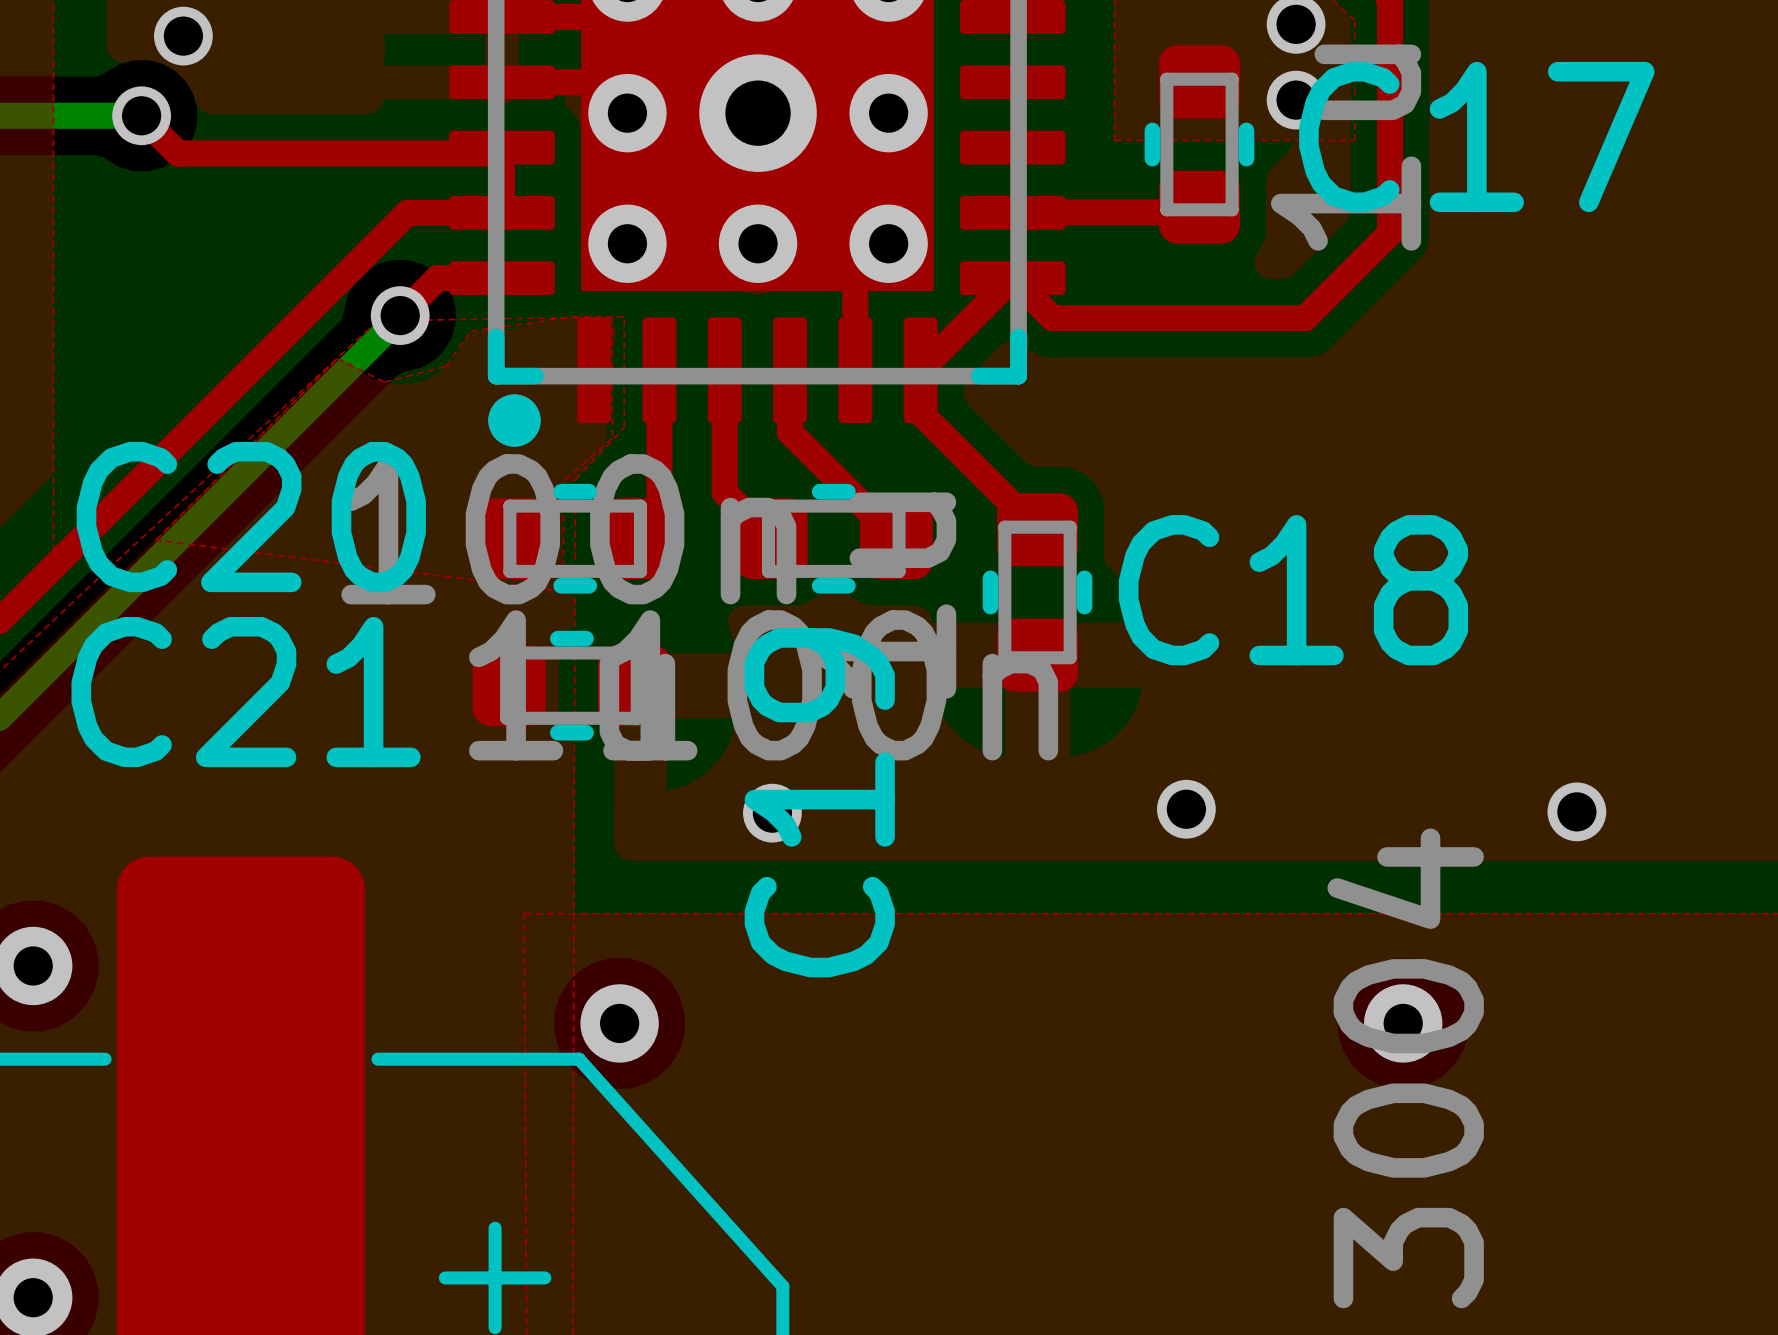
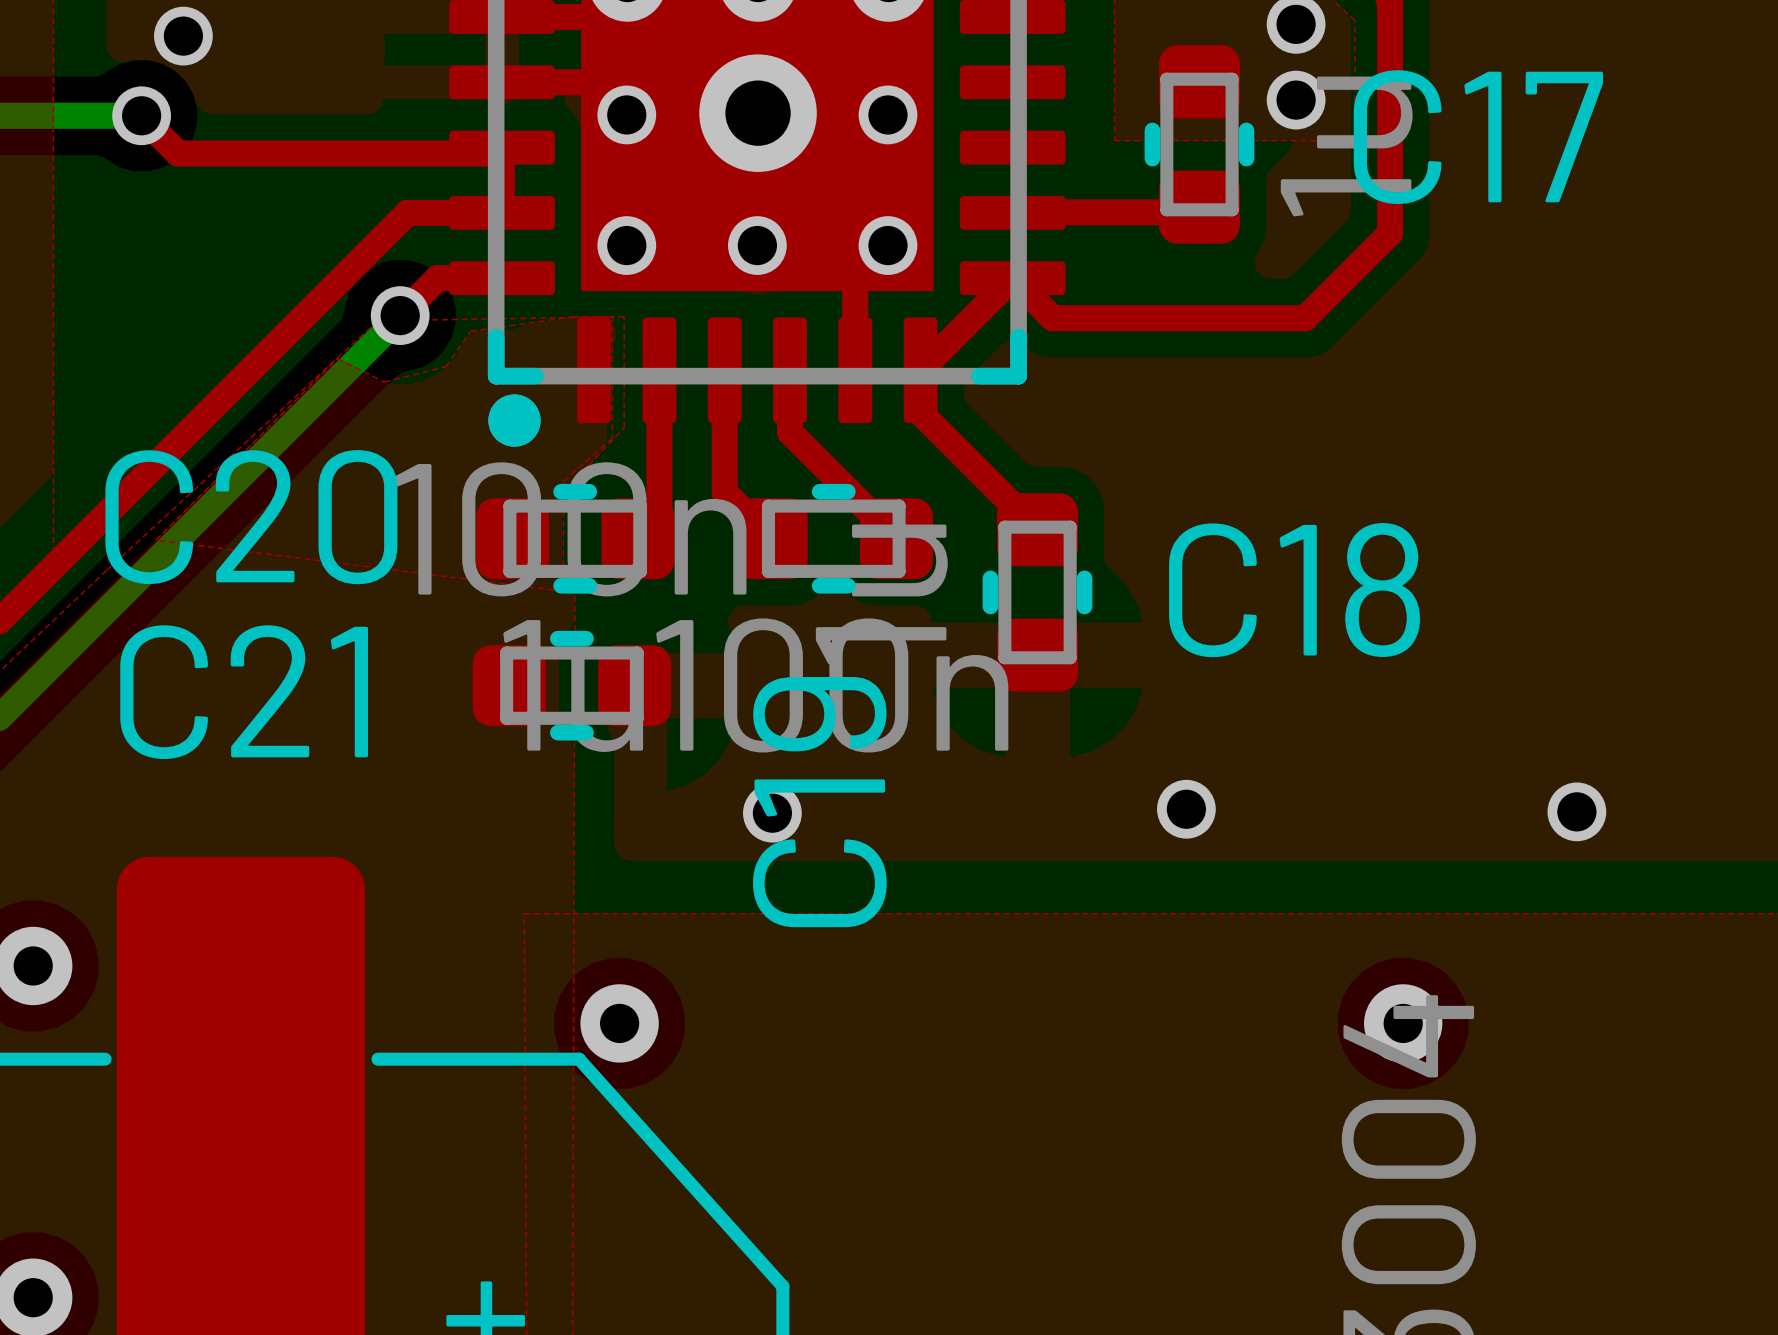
via size: [588, 73, 667, 153] -> [597, 85, 657, 145]
via size: [849, 73, 928, 153] -> [858, 85, 918, 145]
via size: [588, 204, 667, 283] -> [597, 216, 657, 275]
via size: [718, 204, 798, 283] -> [728, 216, 787, 275]
via size: [849, 204, 928, 283] -> [858, 216, 918, 275]

